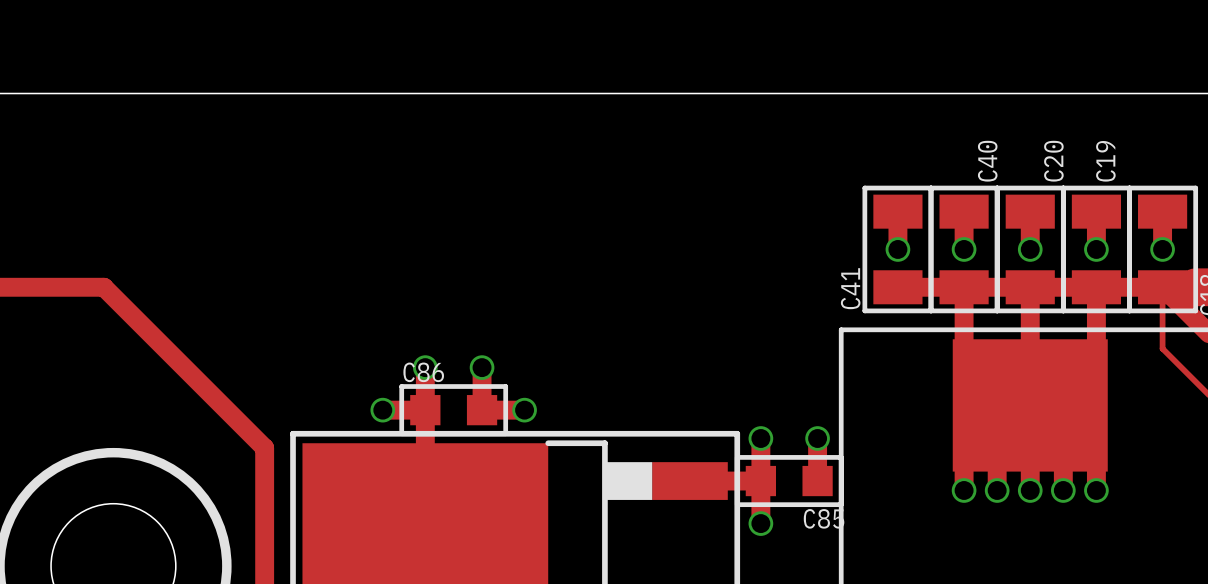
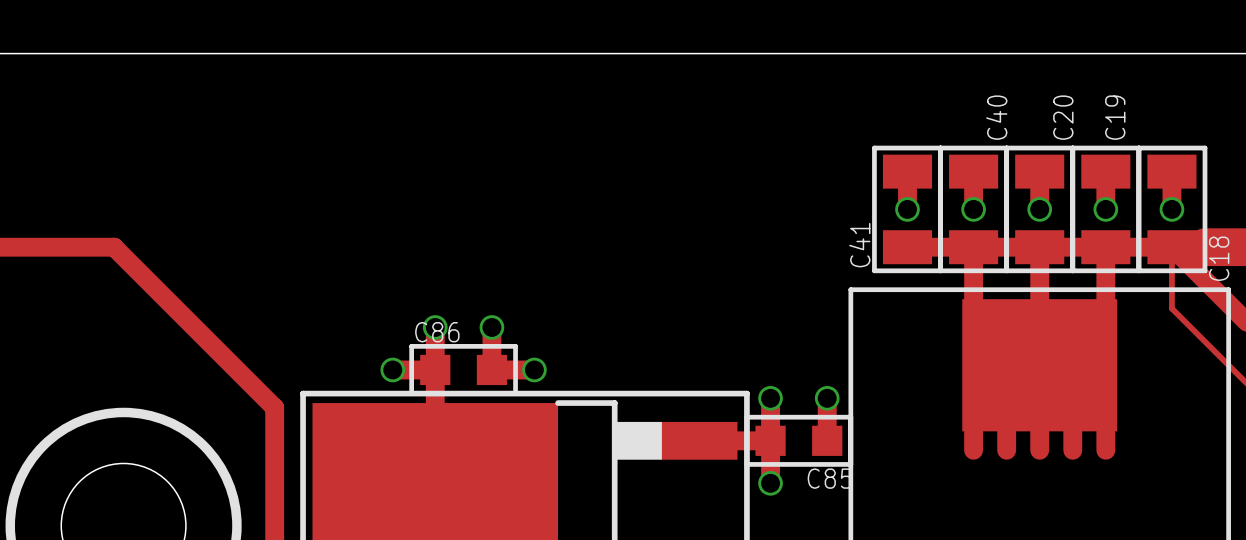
via: (964, 490) -> none
via: (997, 490) -> none
via: (1030, 490) -> none
via: (1063, 490) -> none
via: (1096, 490) -> none

